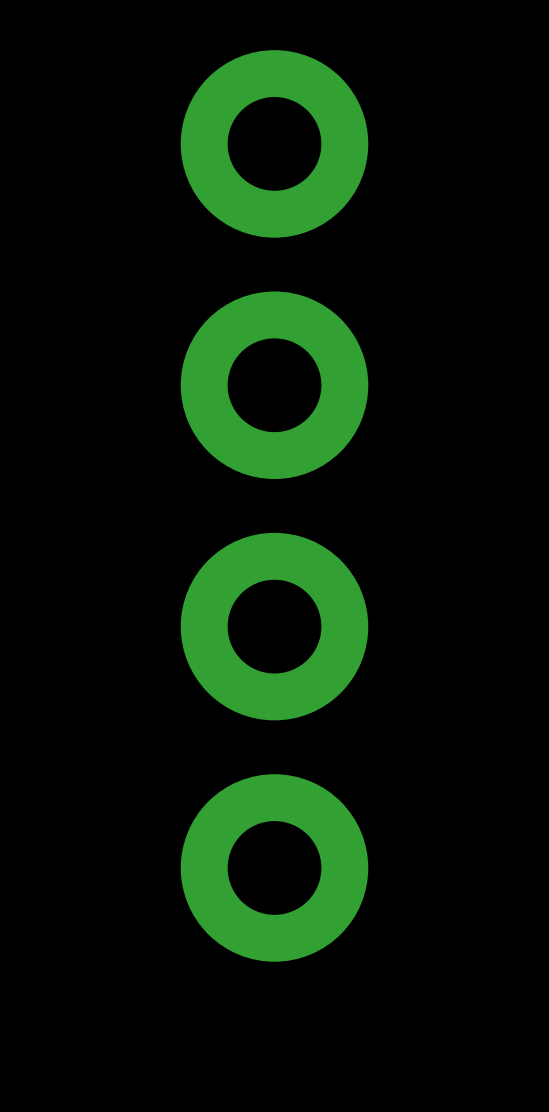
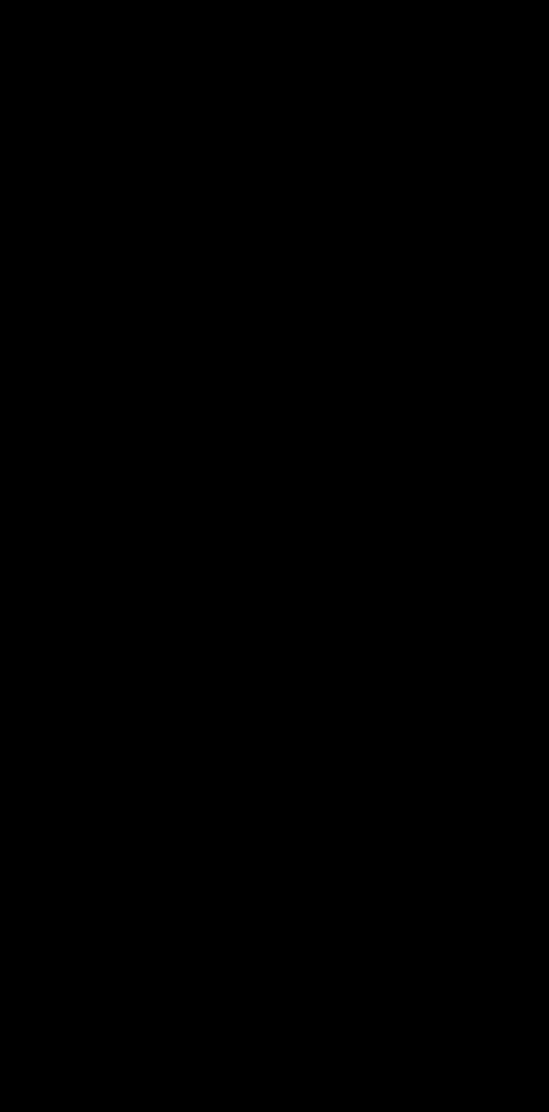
part: (274, 143) -> none
part: (274, 385) -> none
part: (274, 626) -> none
part: (274, 867) -> none

